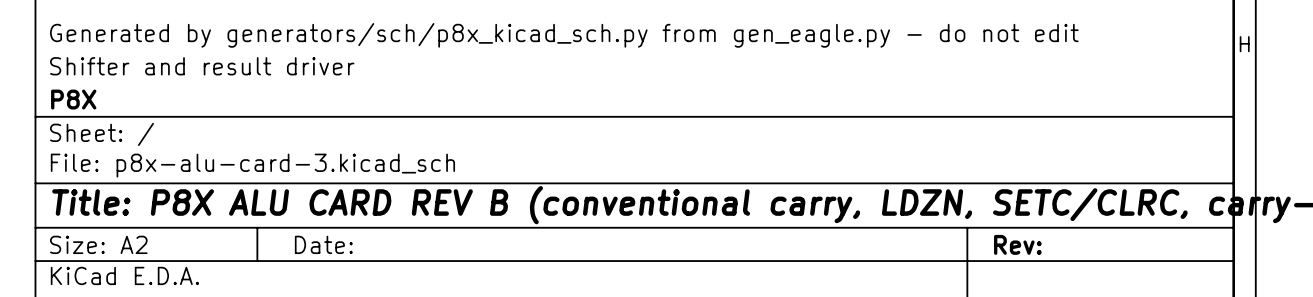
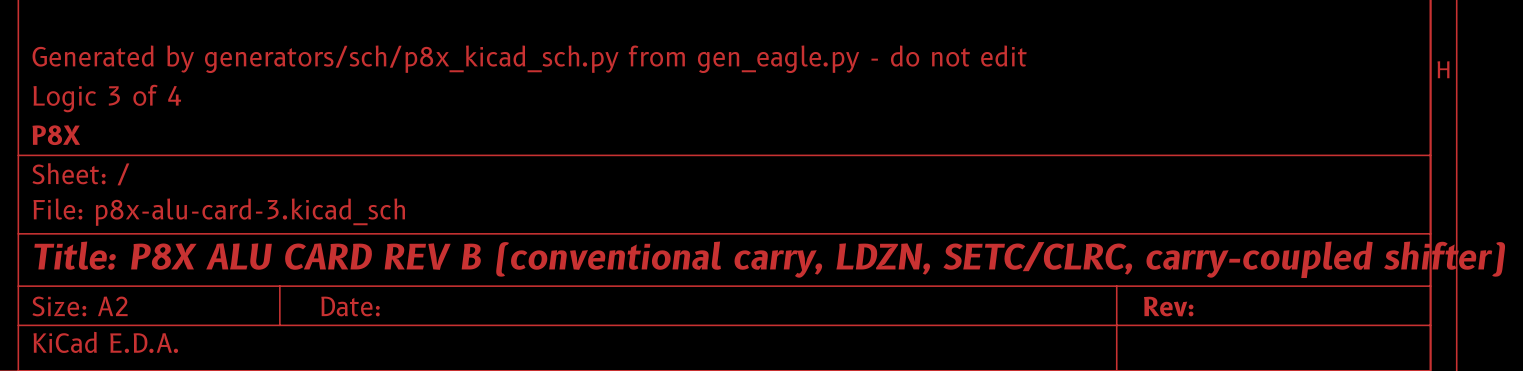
title block: Shifter and result driver (202, 66) -> Logic 3 of 4 (107, 98)

